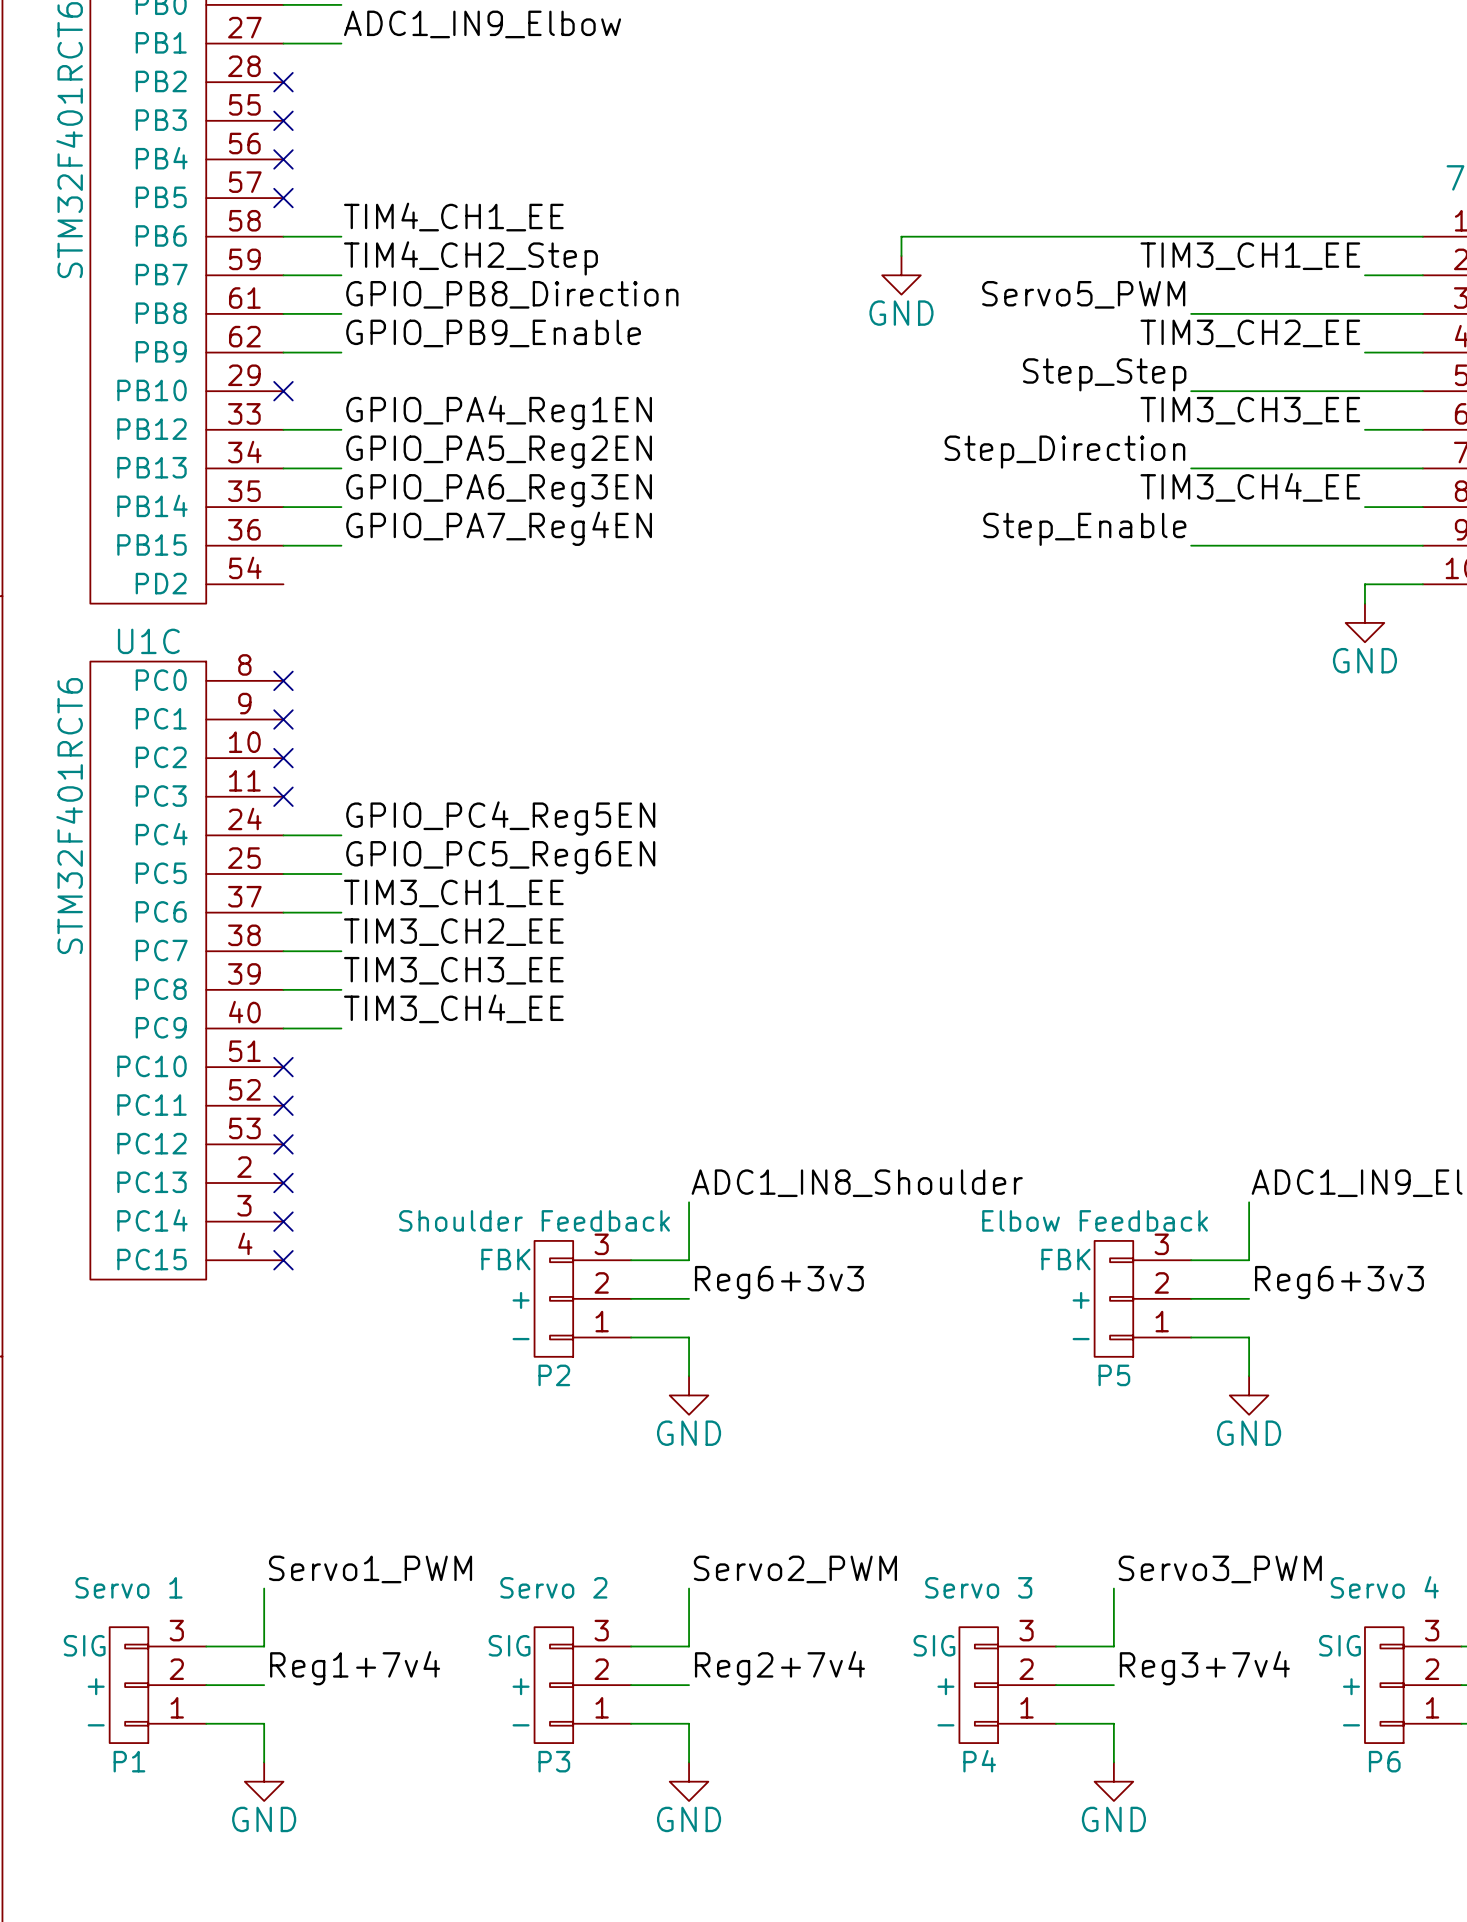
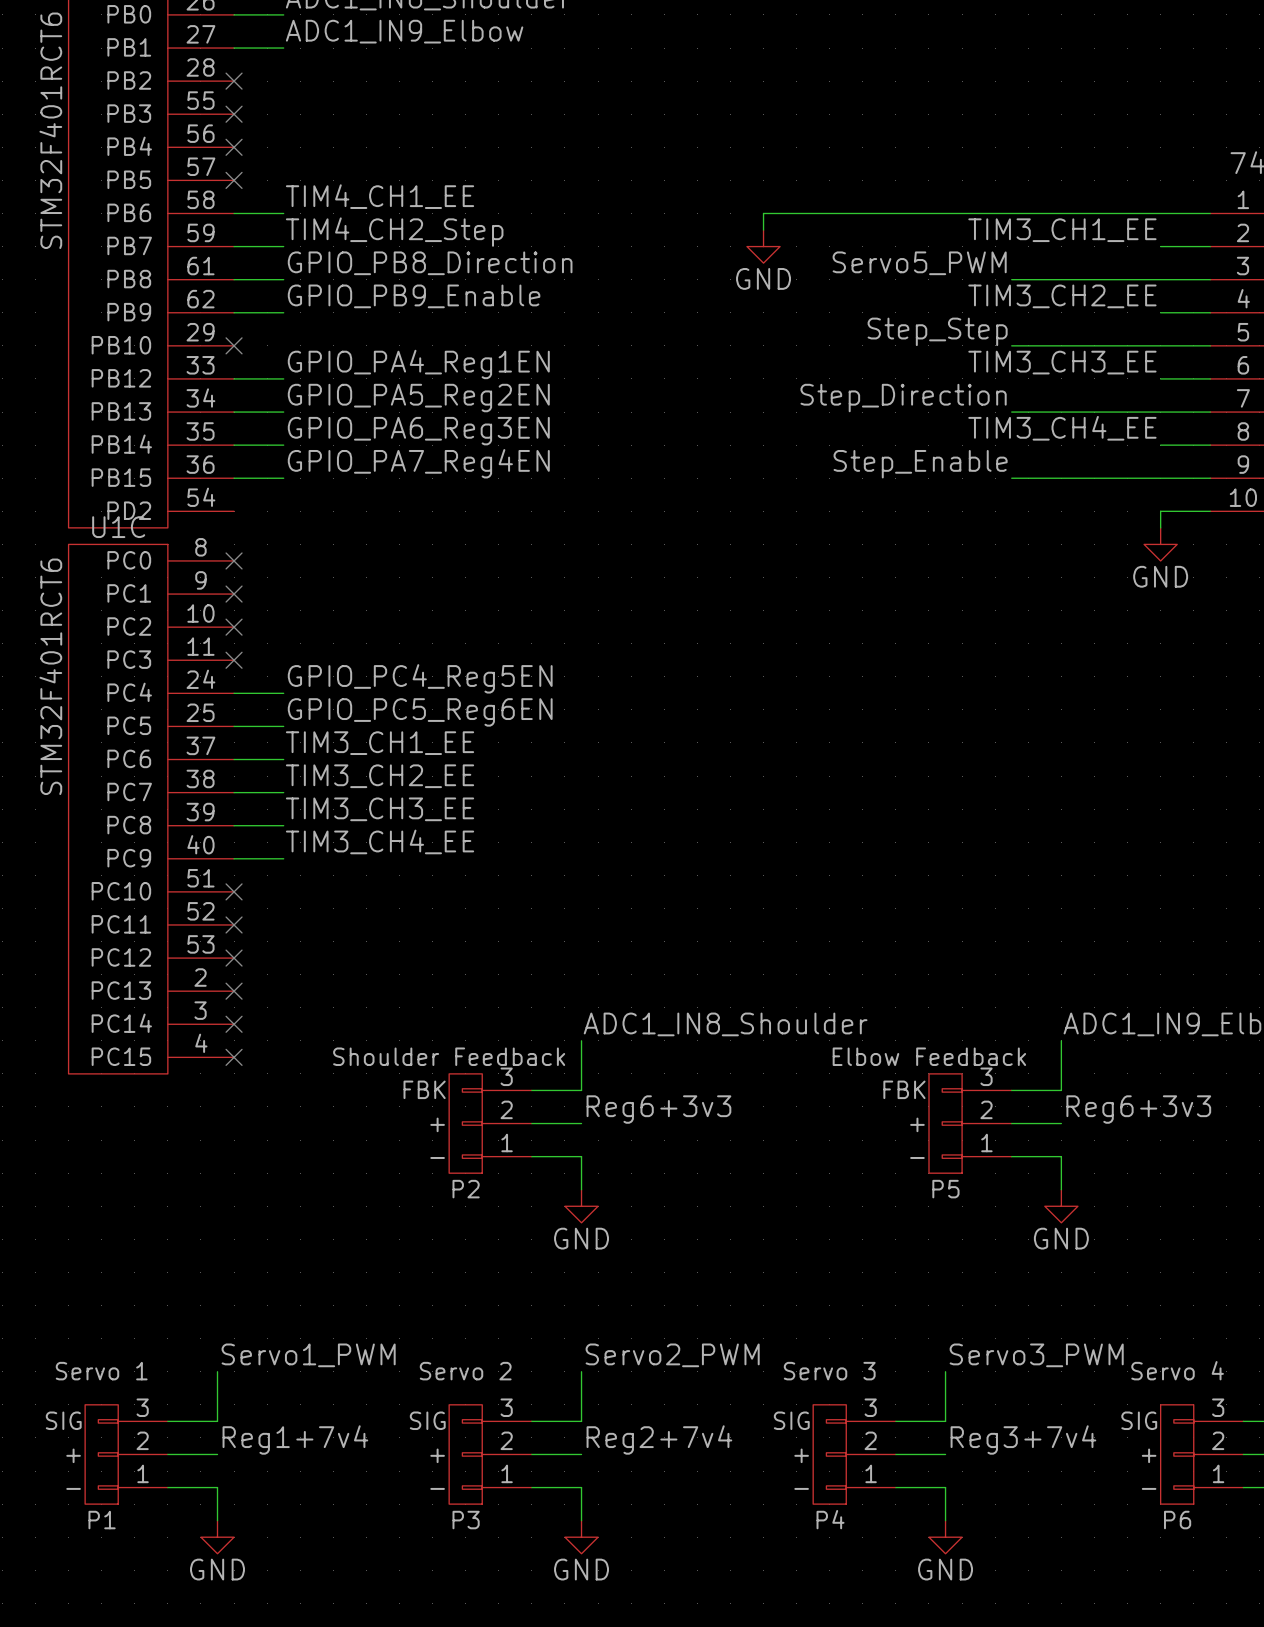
no-connect mark: none -> (234, 560)
label: none -> GPIO_PC4_Reg5EN (420, 678)
no-connect mark: (283, 796) -> none
label: GPIO_PC4_Reg5EN (500, 818) -> GPIO_PC5_Reg6EN (420, 712)
label: GPIO_PC5_Reg6EN (500, 857) -> TIM3_CH1_EE (380, 743)
label: TIM3_CH1_EE (453, 893) -> TIM3_CH2_EE (380, 776)
label: TIM3_CH2_EE (453, 932) -> TIM3_CH3_EE (380, 809)
U1C position: (186, 970) -> (151, 809)
label: TIM3_CH3_EE (453, 970) -> TIM3_CH4_EE (380, 841)
label: TIM3_CH4_EE (453, 1008) -> none
wire: (283, 1028) (341, 1028) -> (234, 693) (283, 693)
no-connect mark: none -> (234, 891)
no-connect mark: (283, 1260) -> none

